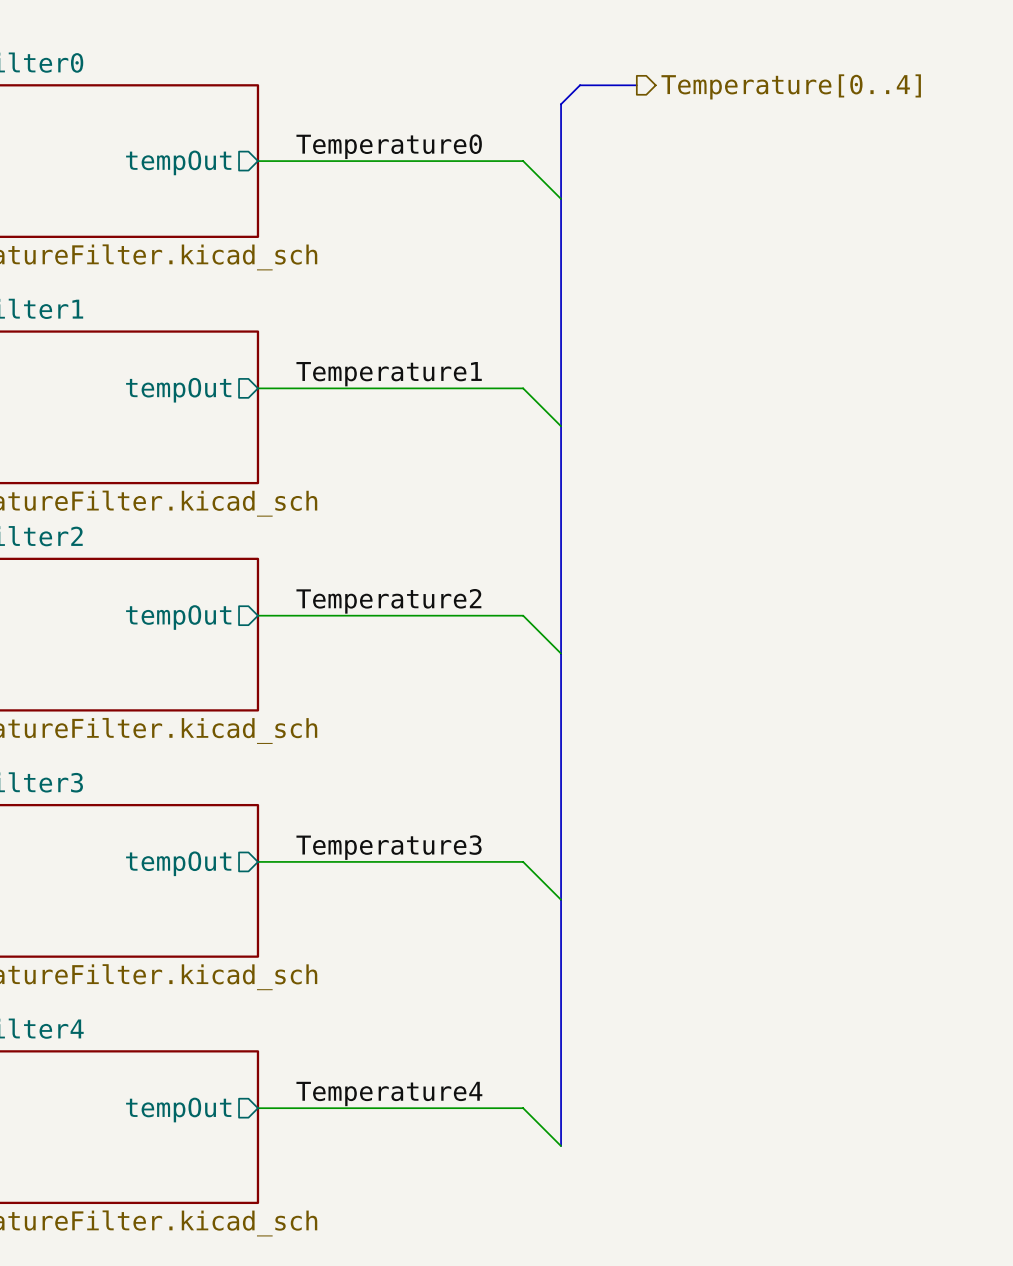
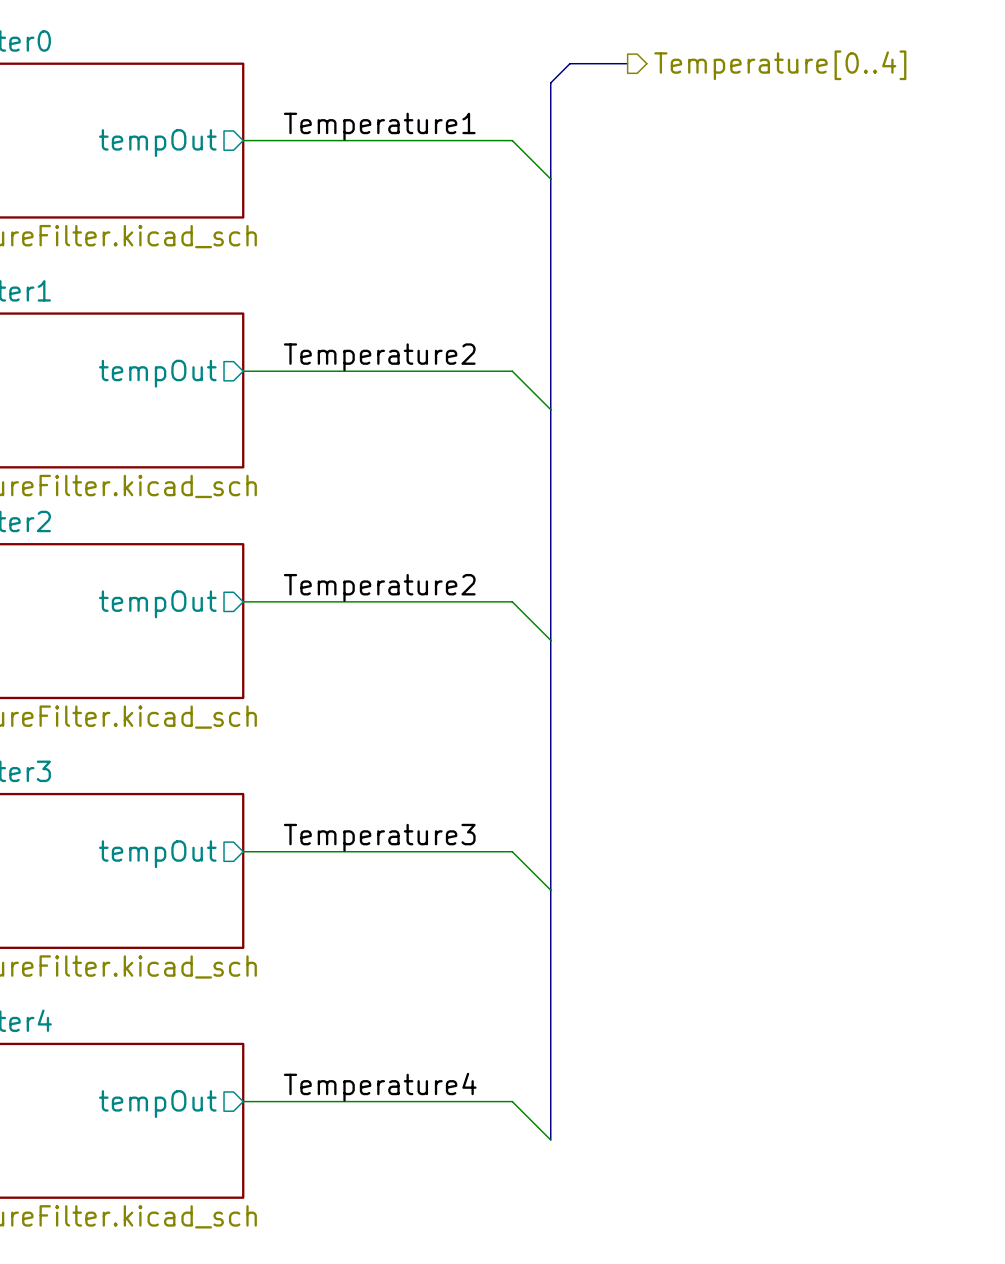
label: Temperature0 (389, 146) -> Temperature1 (379, 126)
label: Temperature1 (389, 374) -> Temperature2 (379, 357)

